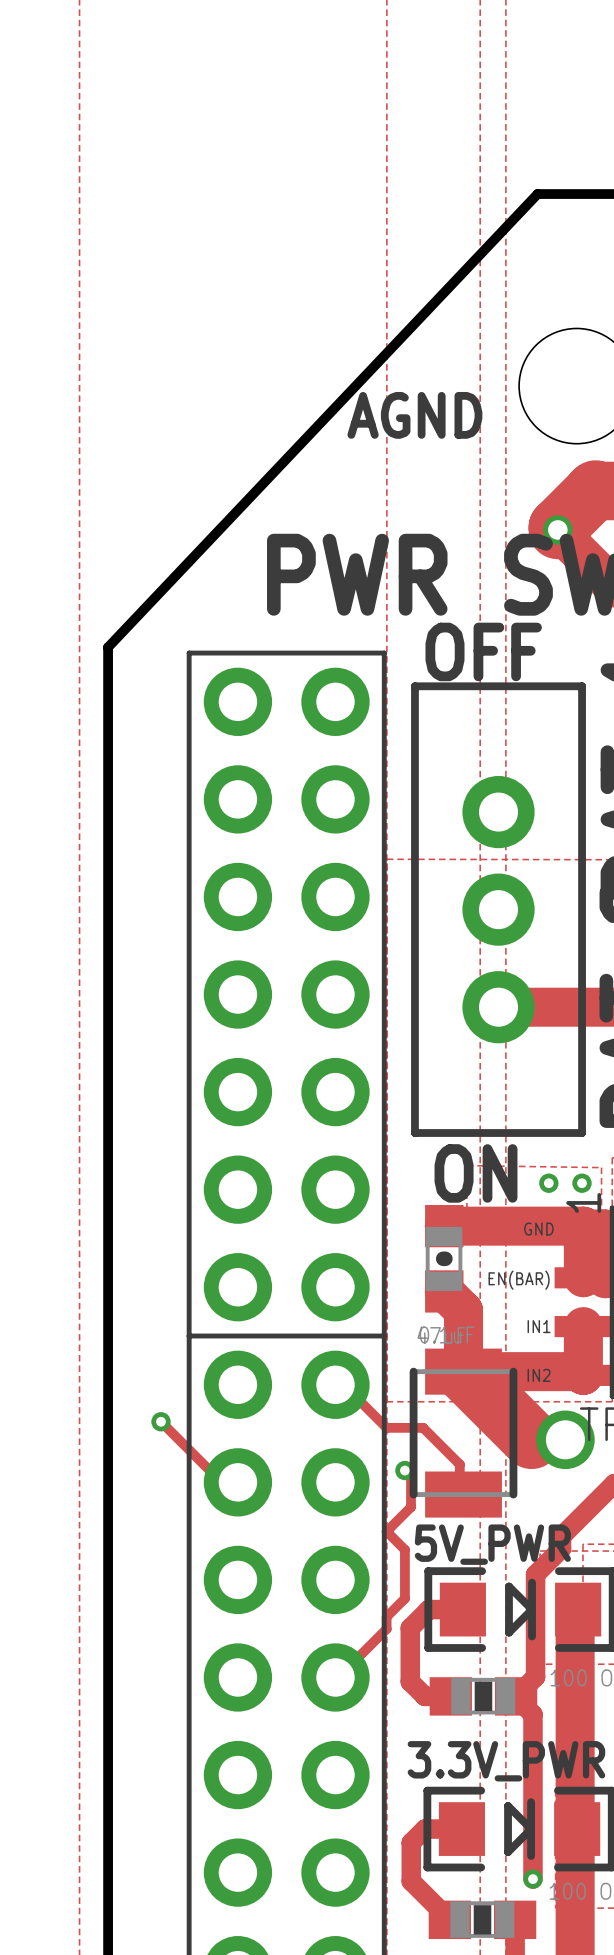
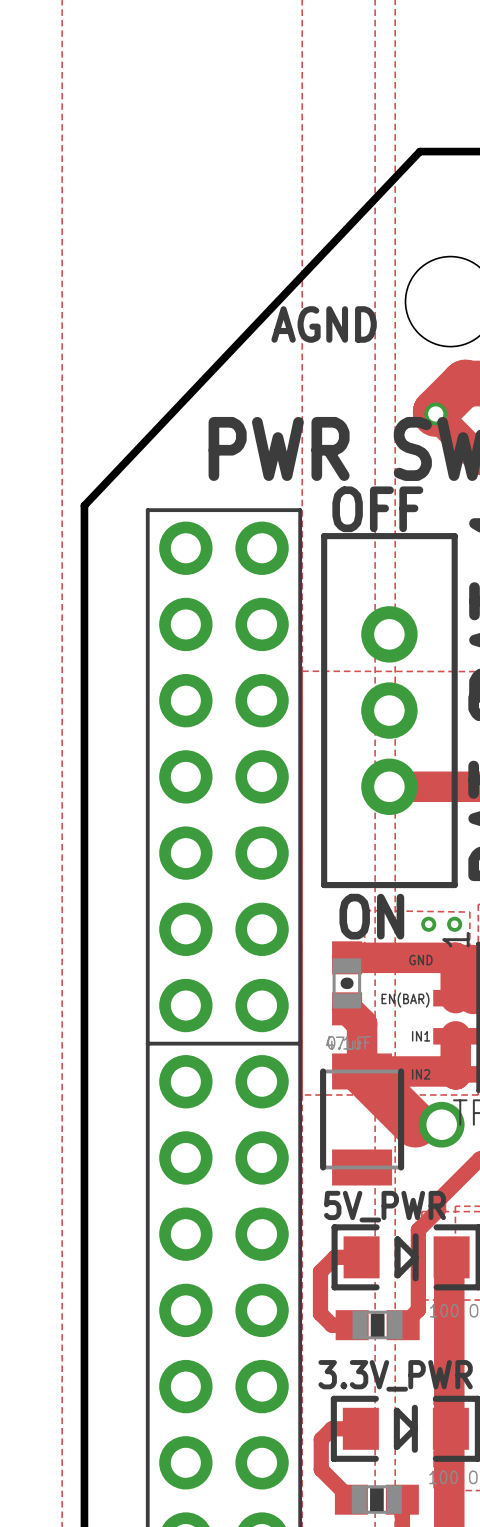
track: (335, 1384) (337, 1379) (386, 1427) (423, 1427) (459, 1464) (459, 1488) (463, 1494) -> none
track: (161, 1421) (215, 1476) (234, 1476) (237, 1482) -> none
via: (161, 1421) -> none
track: (404, 1470) (411, 1476) (411, 1507) (386, 1531) (404, 1549) (404, 1598) (386, 1616) (386, 1629) (337, 1677) (335, 1677) -> none
via: (404, 1470) -> none
track: (516, 1696) (532, 1714) (532, 1879) -> none
via: (532, 1879) -> none

